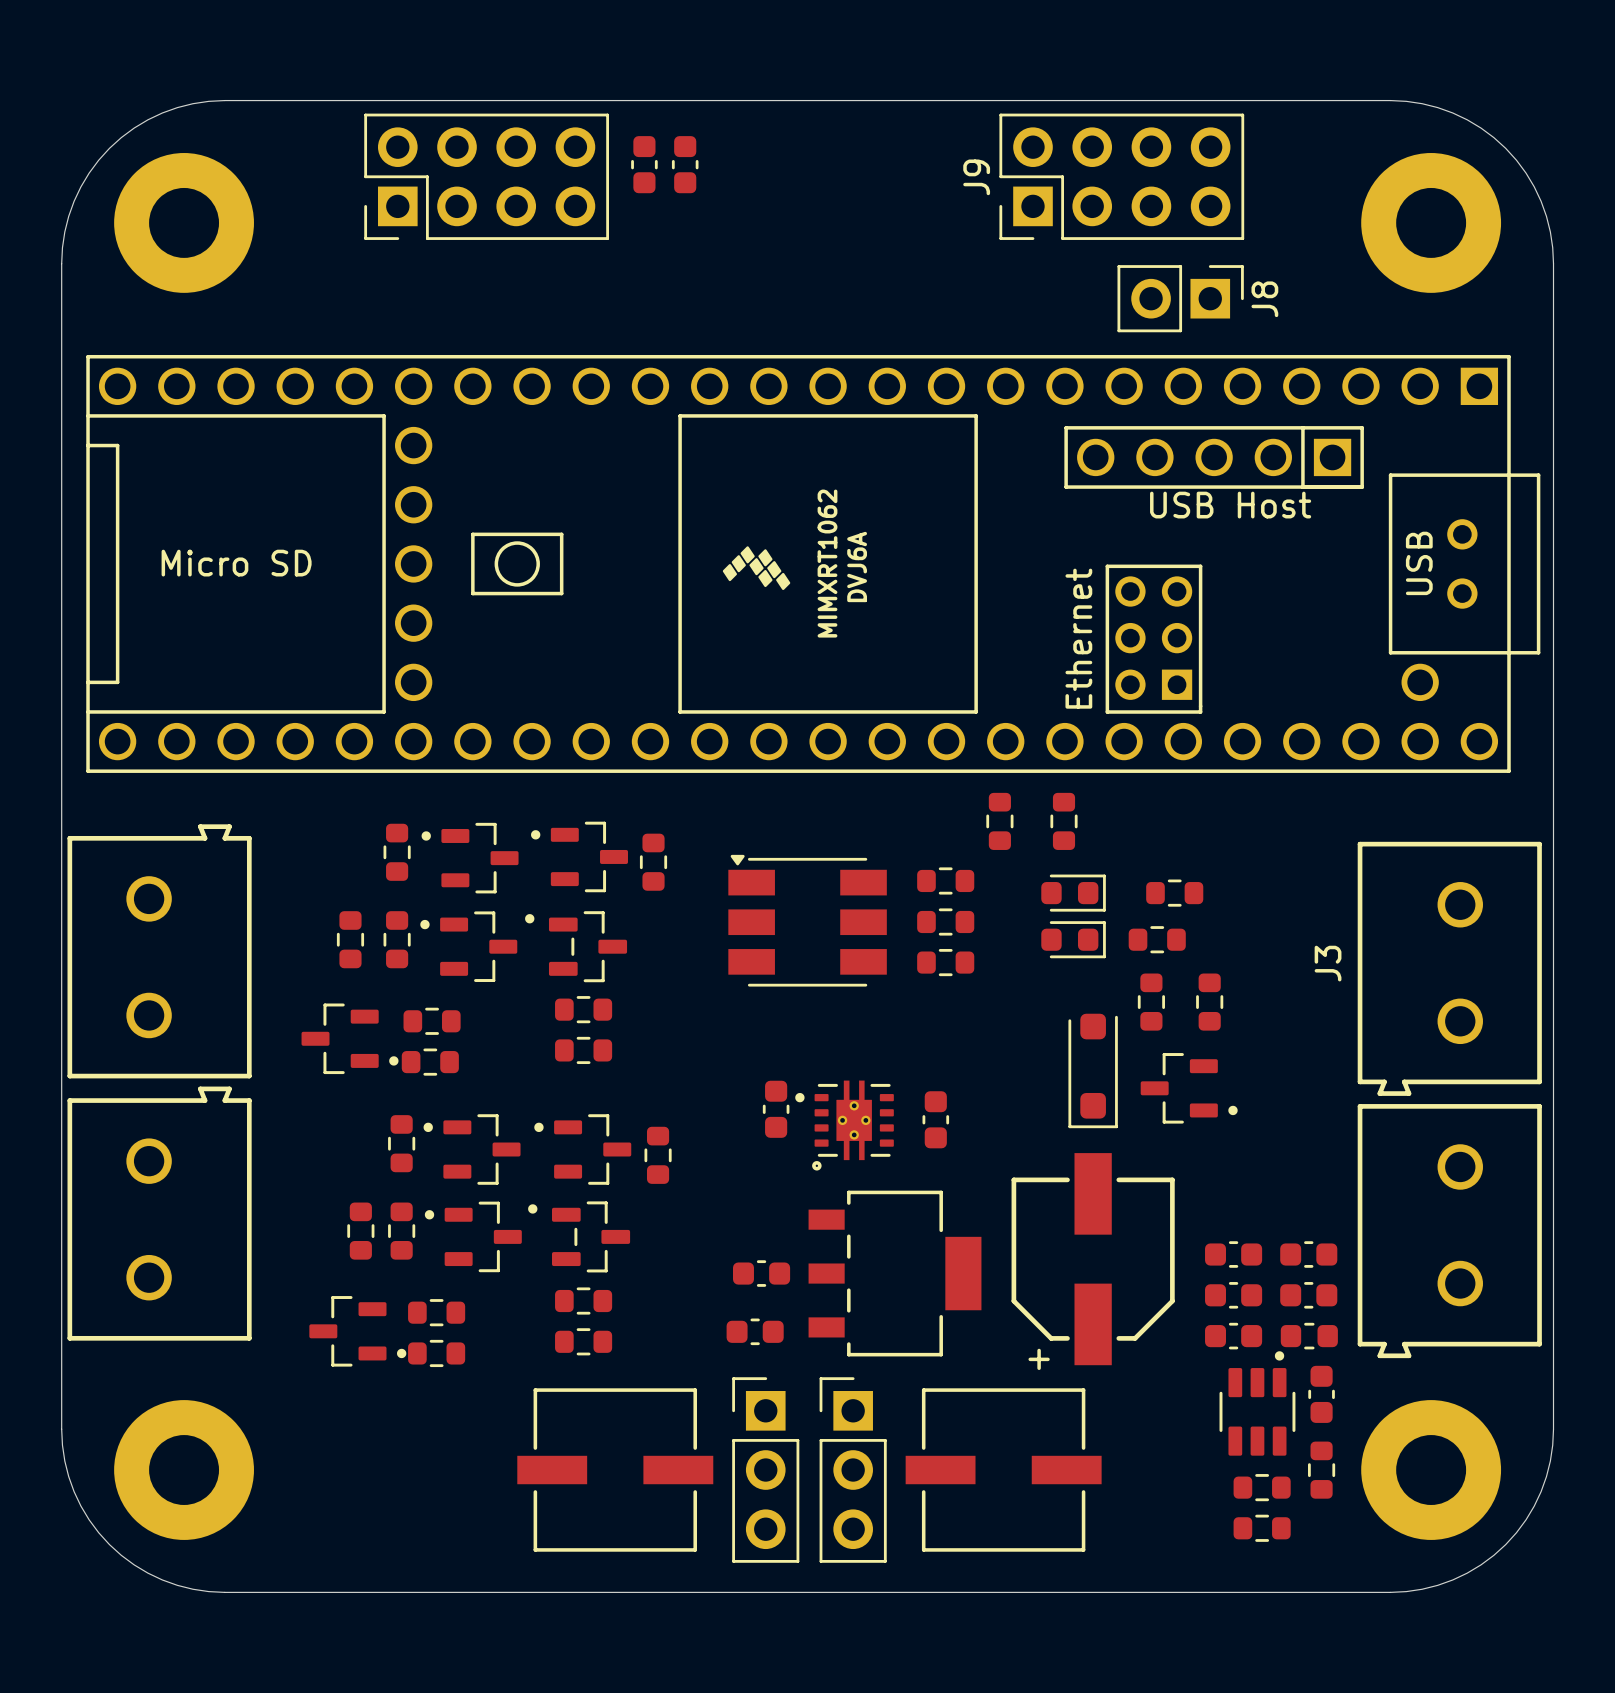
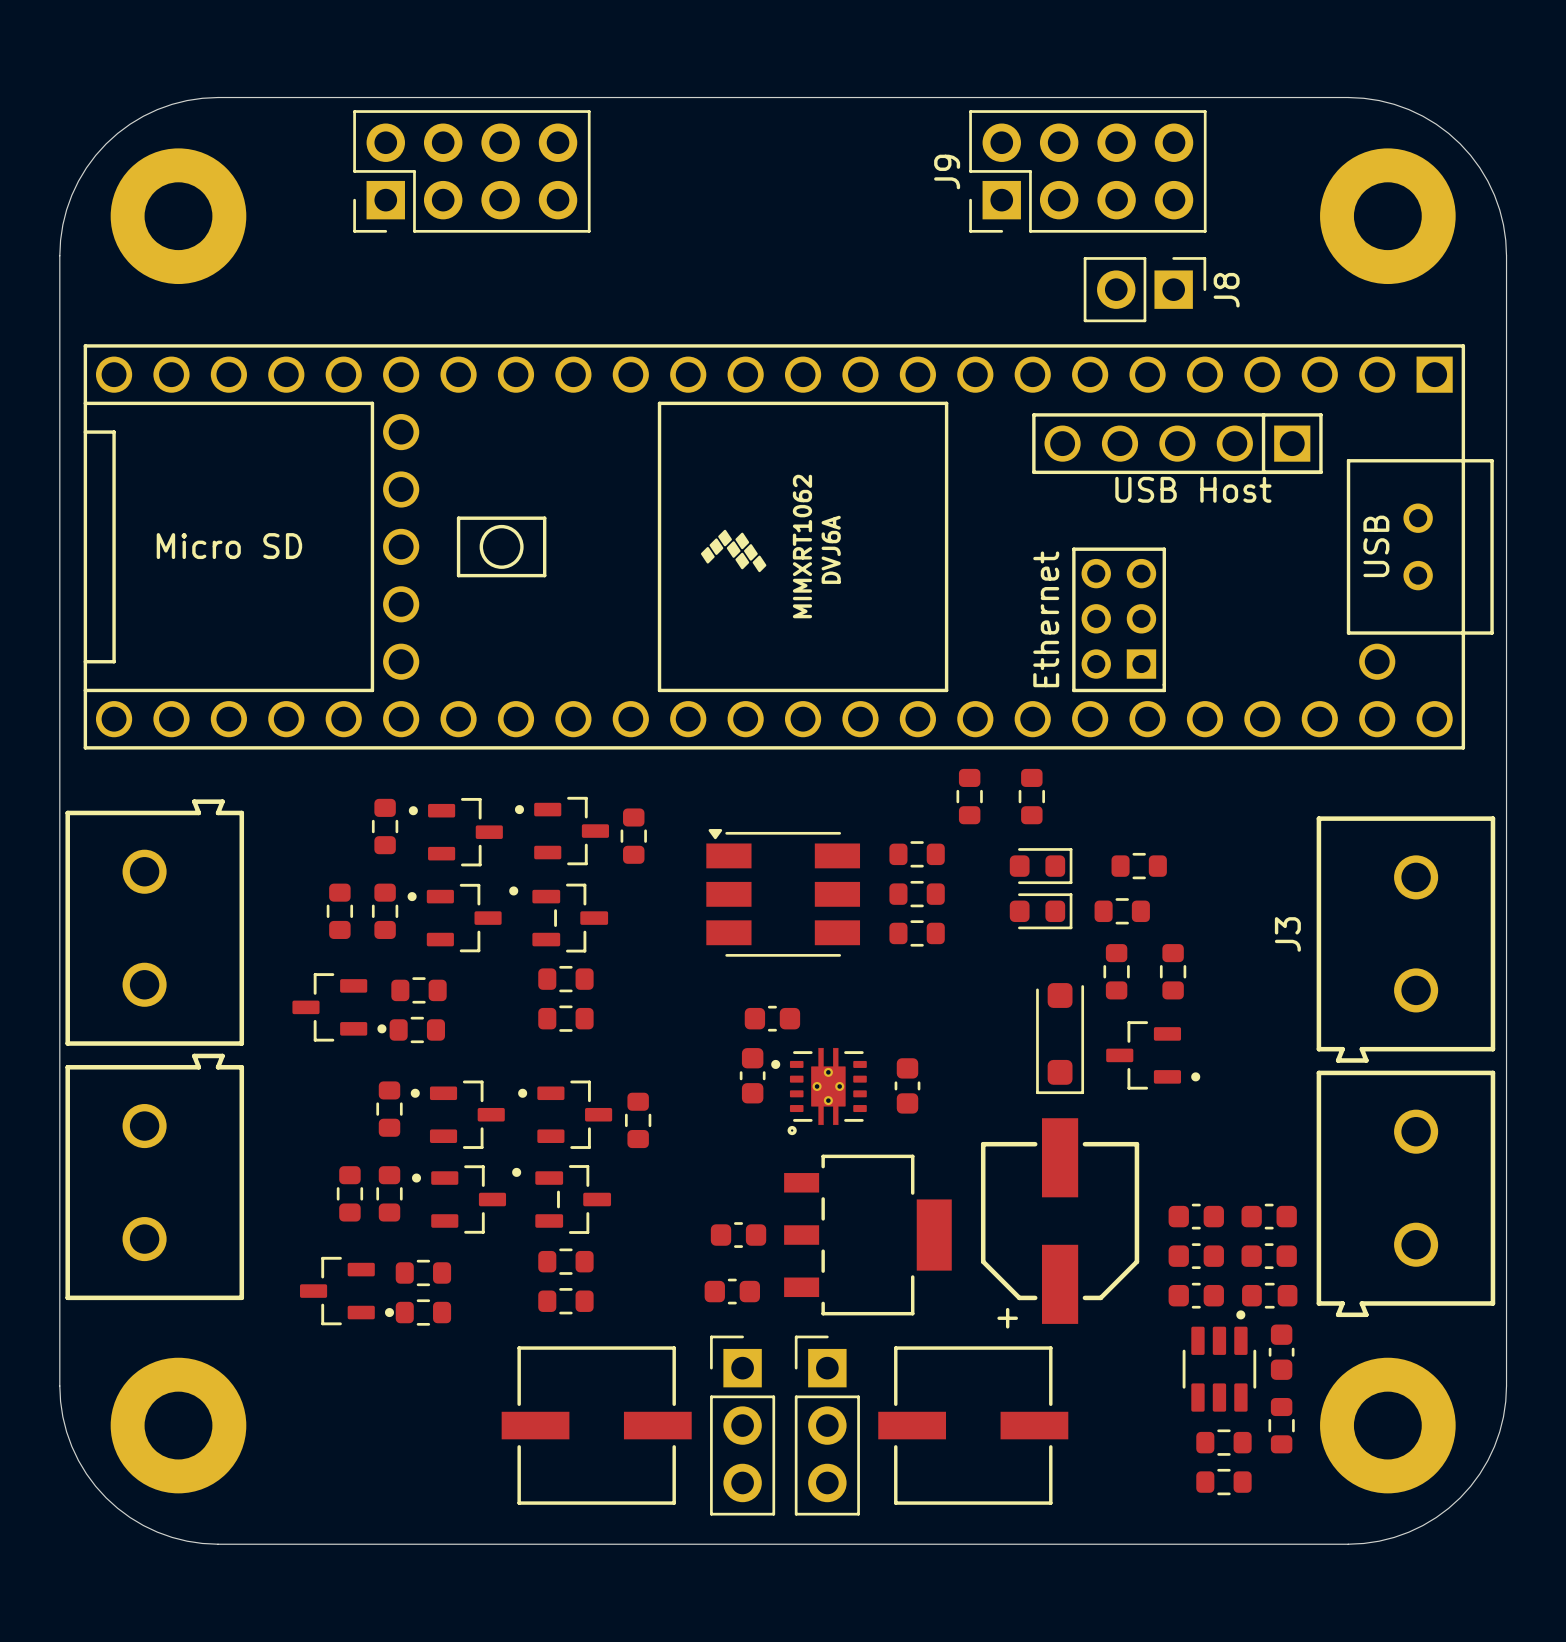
part: (644, 164) -> none
part: (685, 164) -> none
part: none -> (772, 1018)

